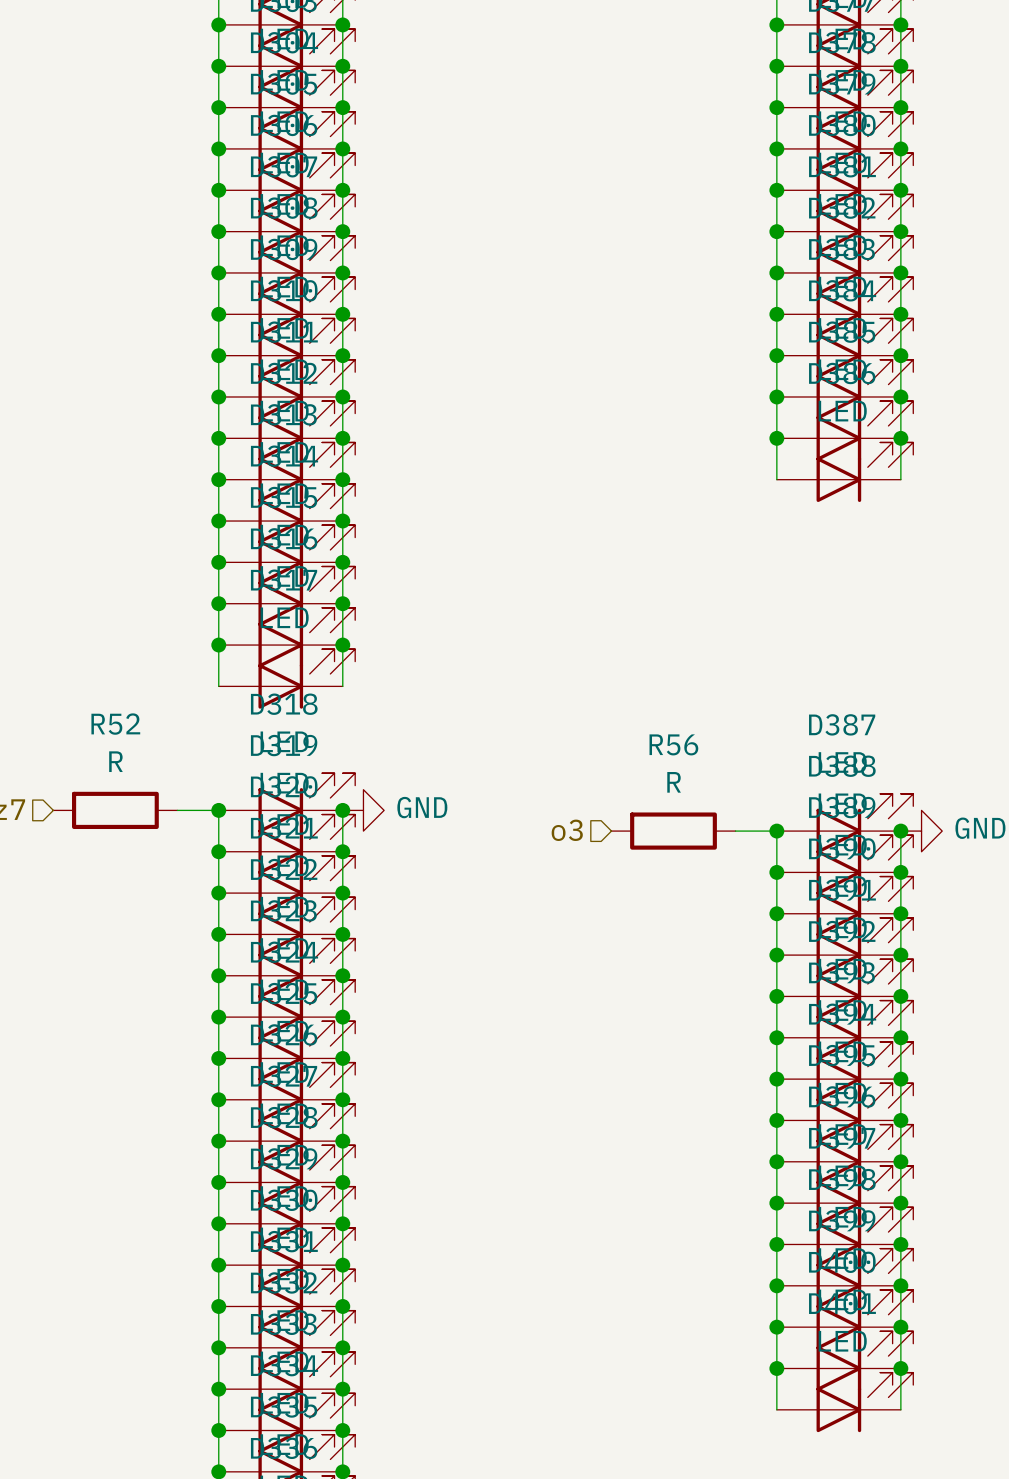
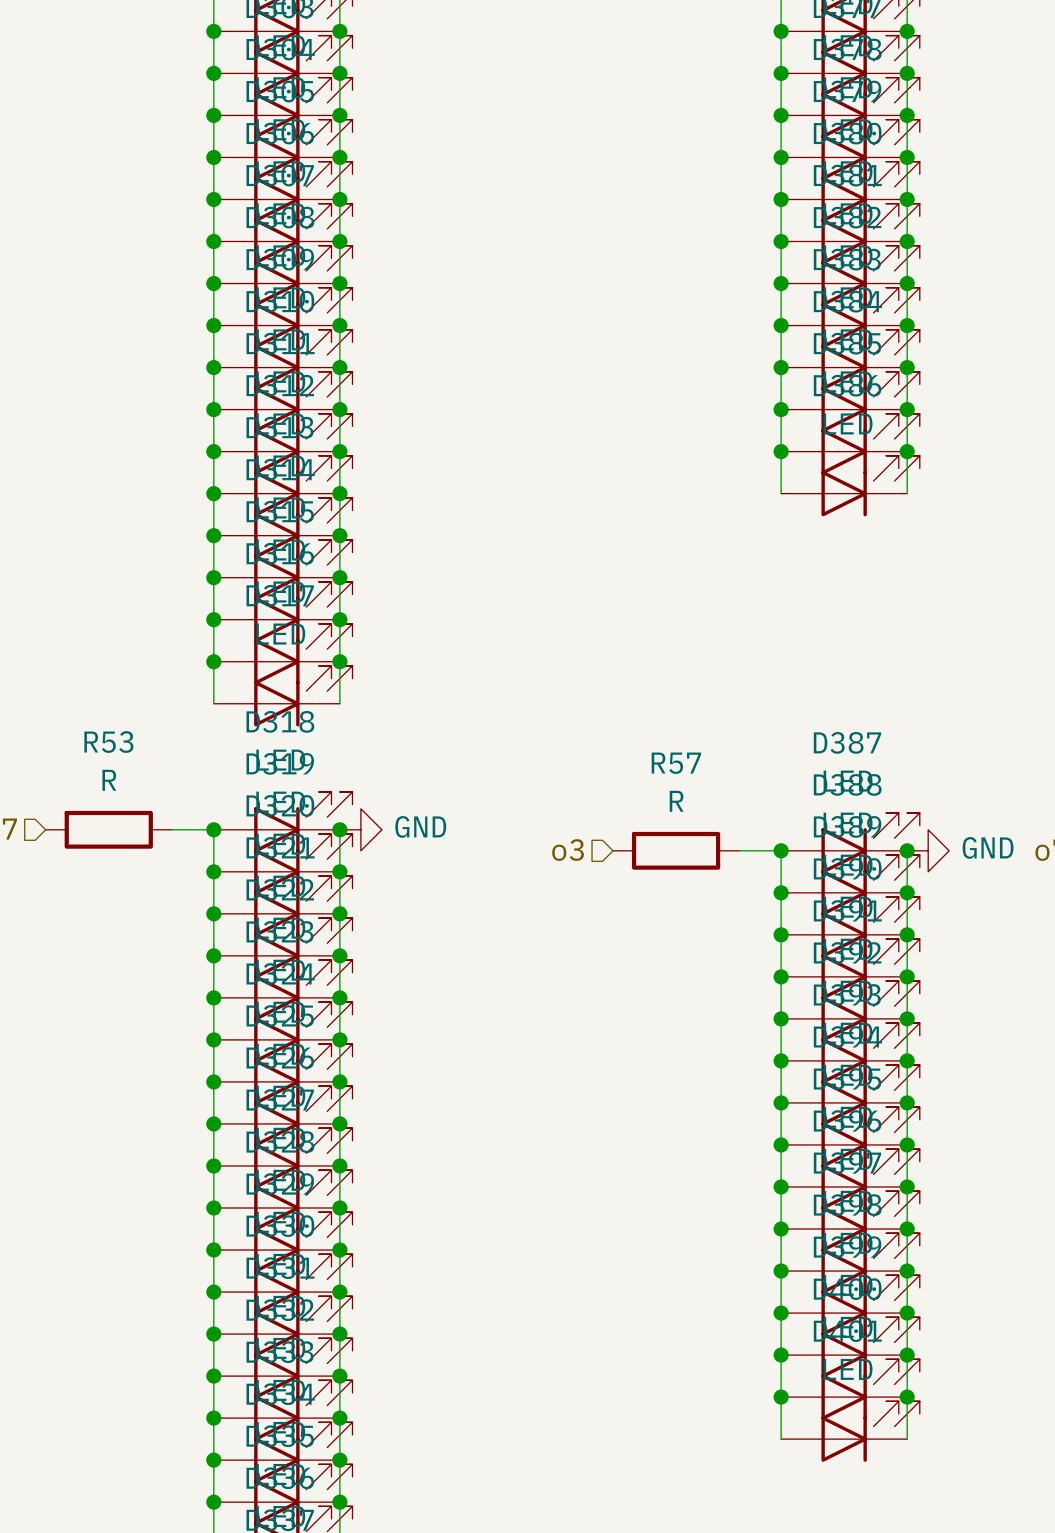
R52 name: R52 (115, 724) -> R53 (108, 742)
R56 name: R56 (673, 744) -> R57 (676, 763)

